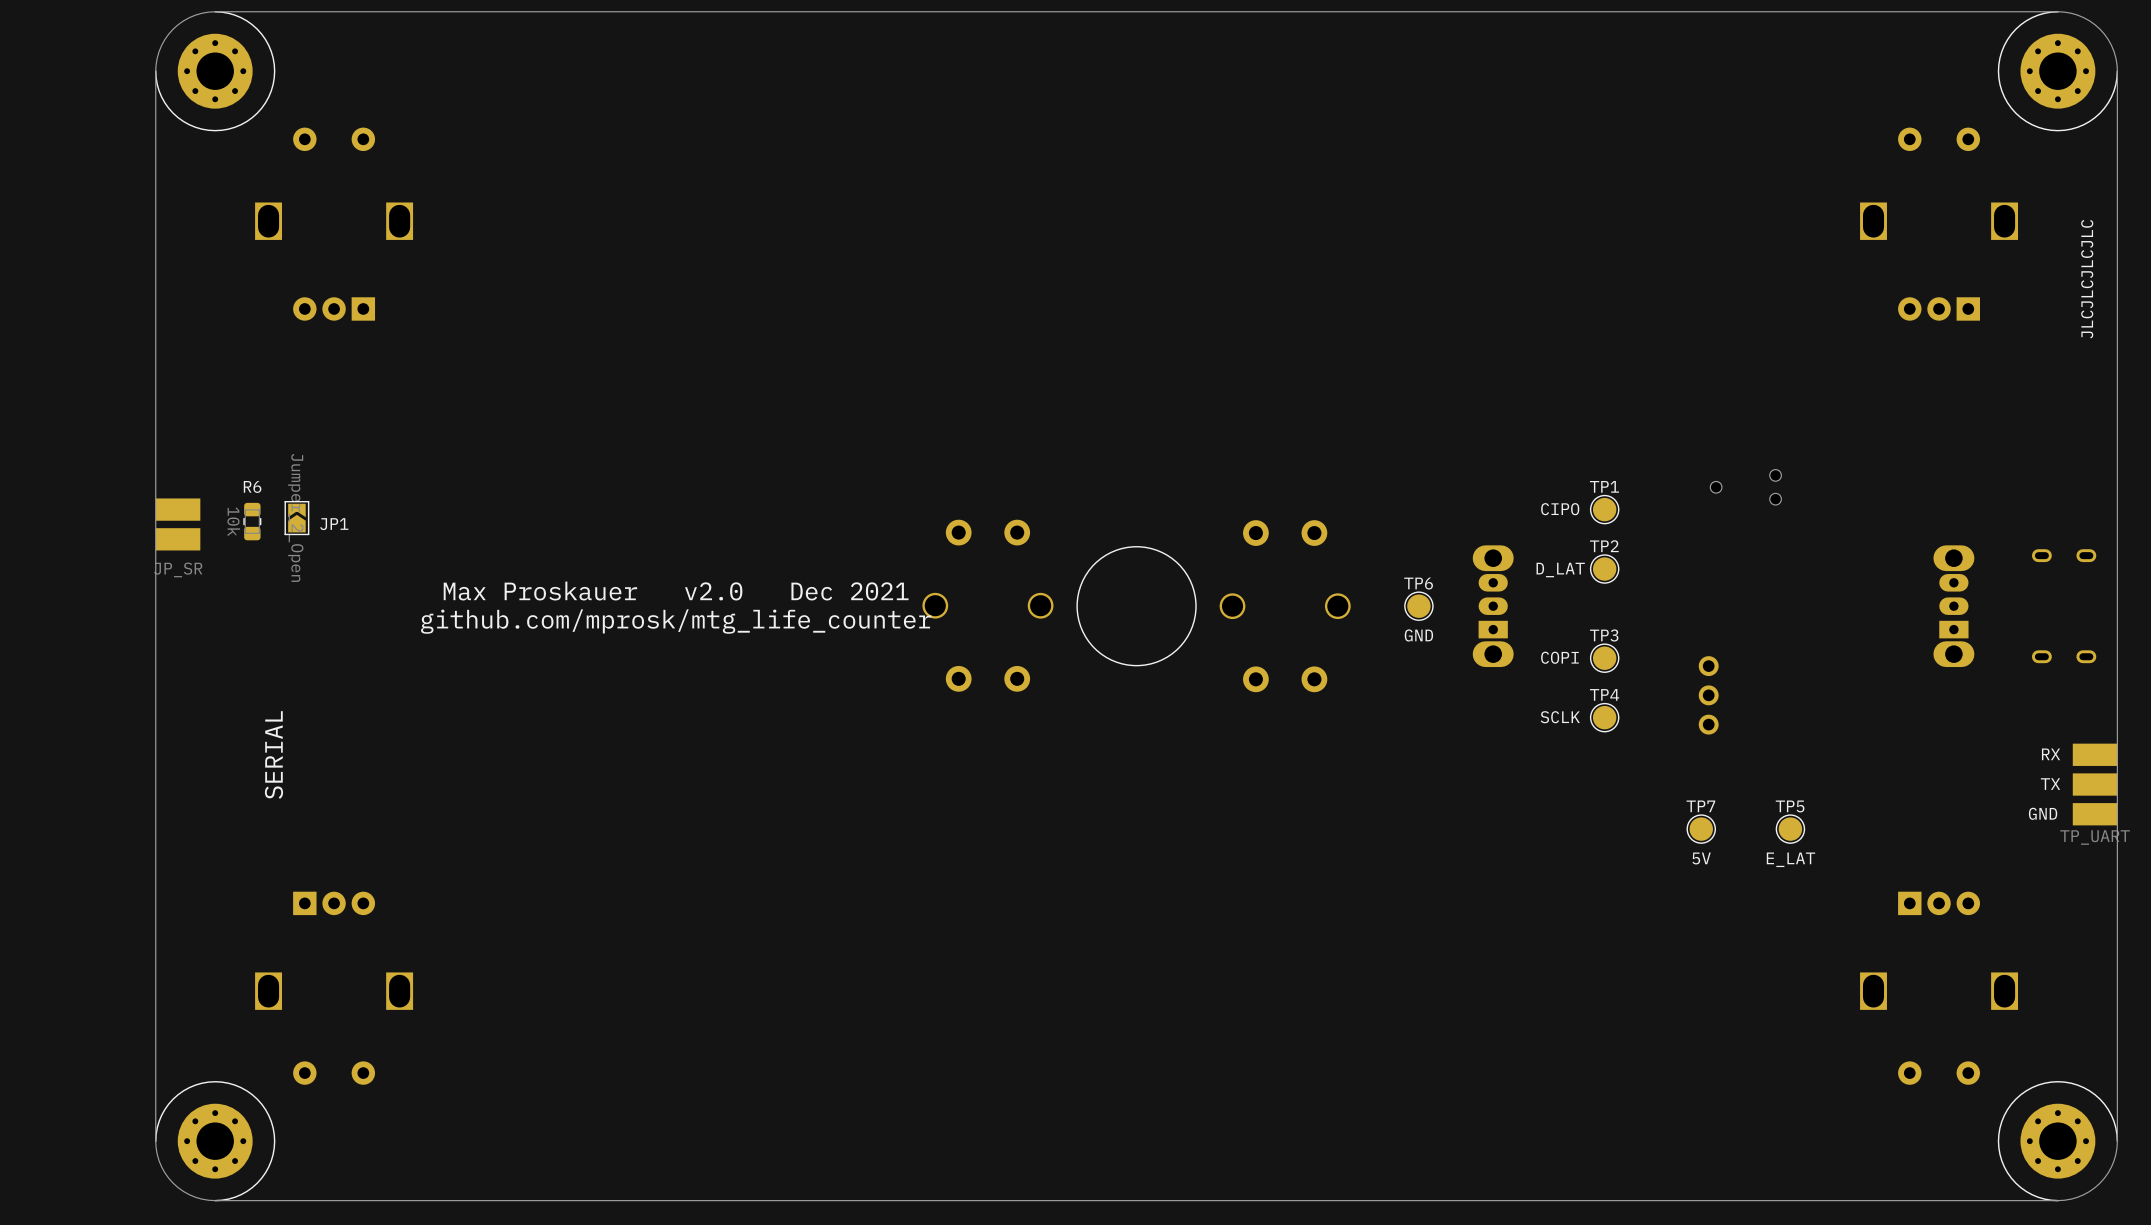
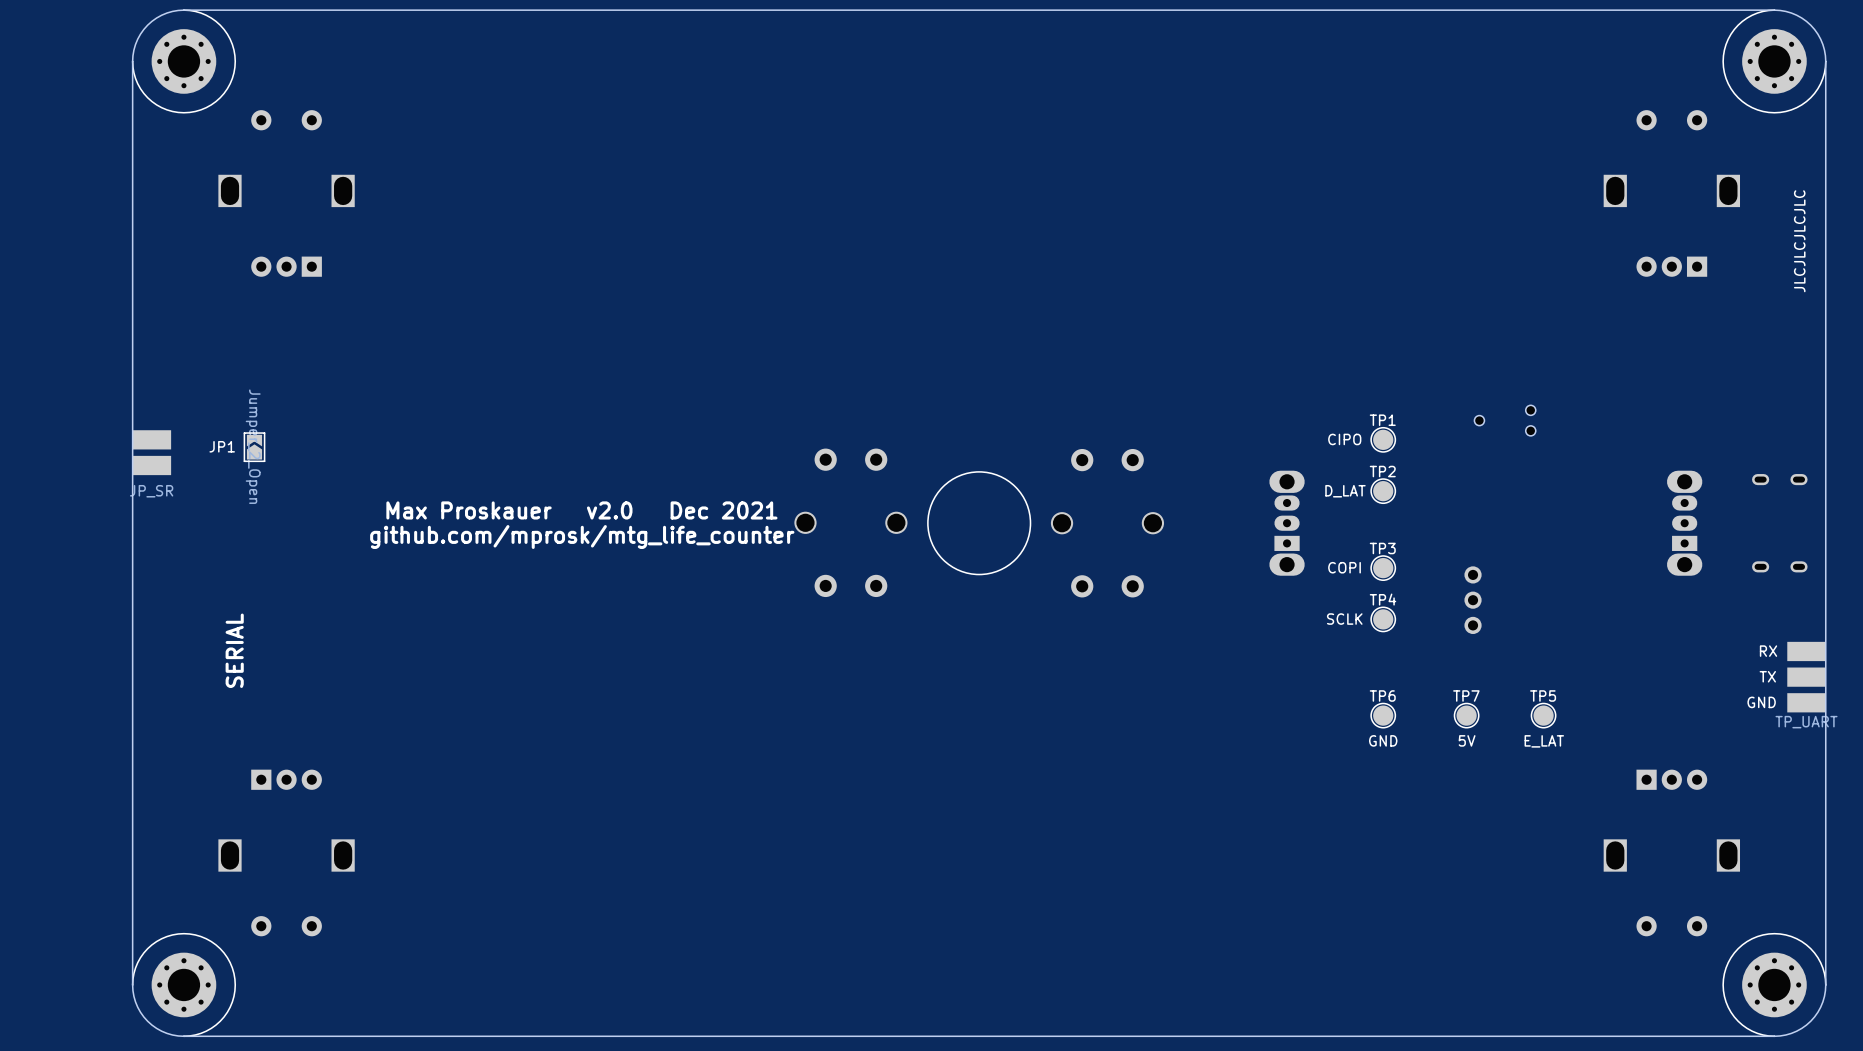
R6: 10k (252, 521) -> none
JP1 name position: JP1 (334, 524) -> JP1 (222, 446)
TP6 position: (1418, 606) -> (1383, 715)

